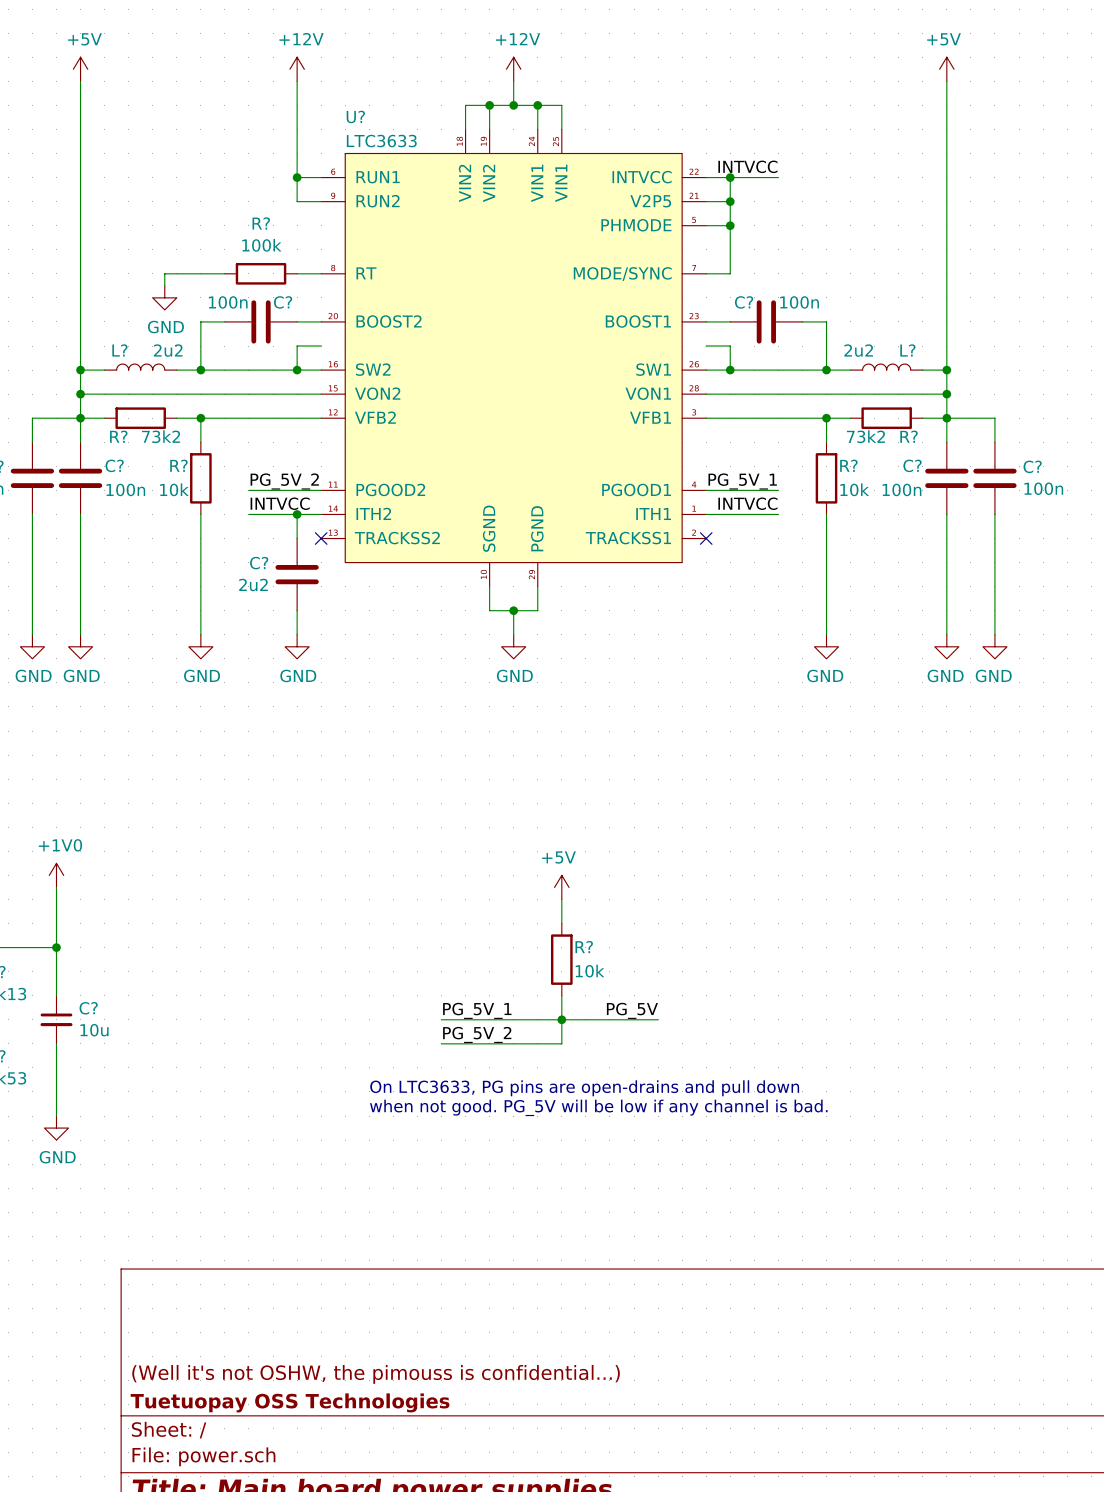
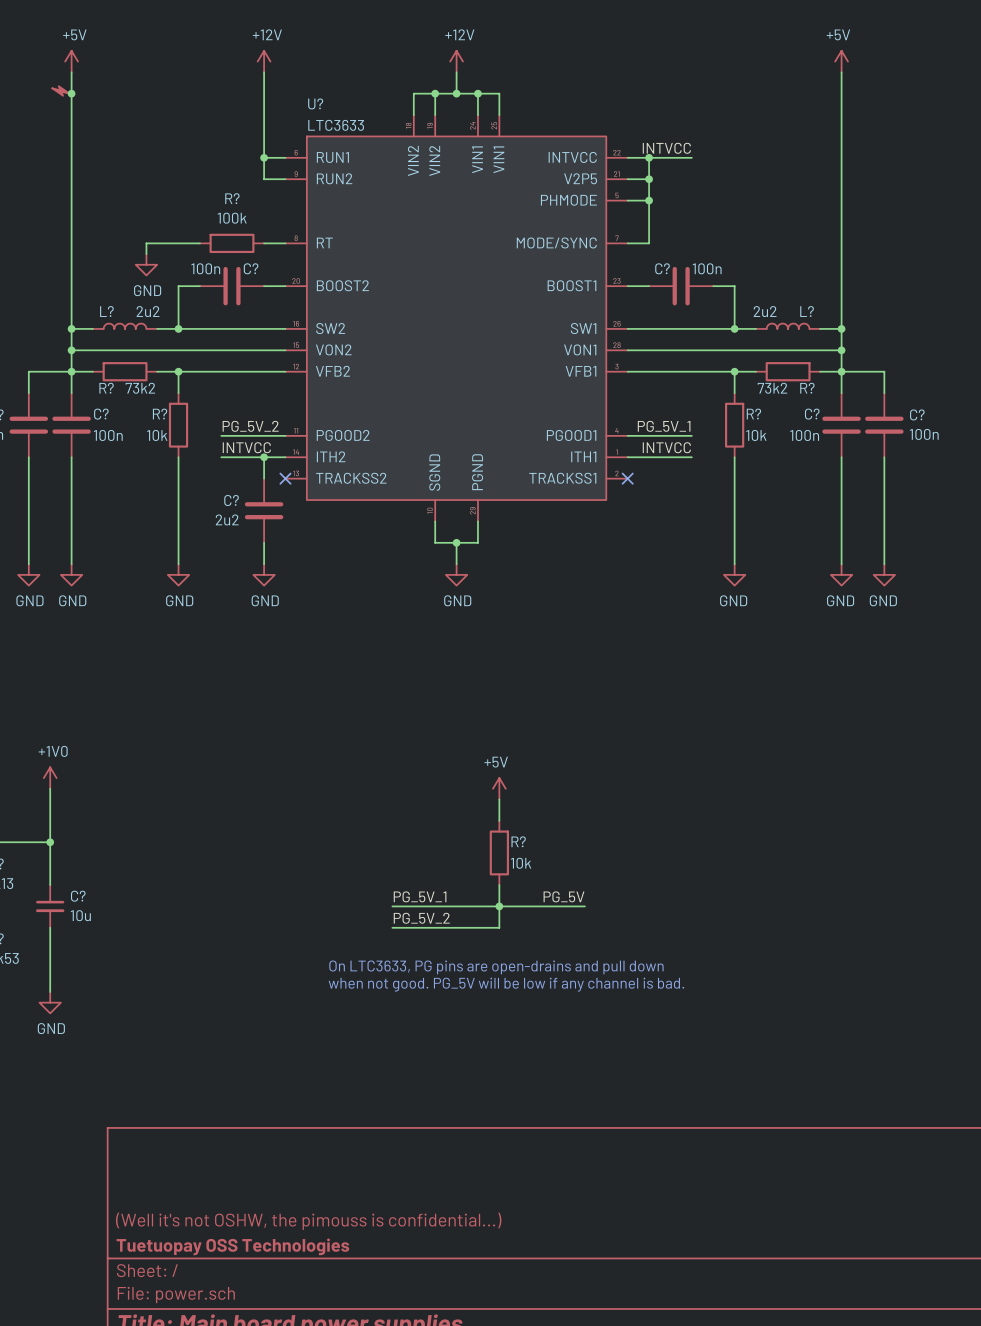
power symbol: none -> (60, 90)
junction: none -> (71, 93)
wire: (321, 346) (297, 346) (297, 370) -> none
wire: (706, 346) (730, 346) (730, 370) -> none
junction: (297, 370) -> none
junction: (730, 370) -> none

